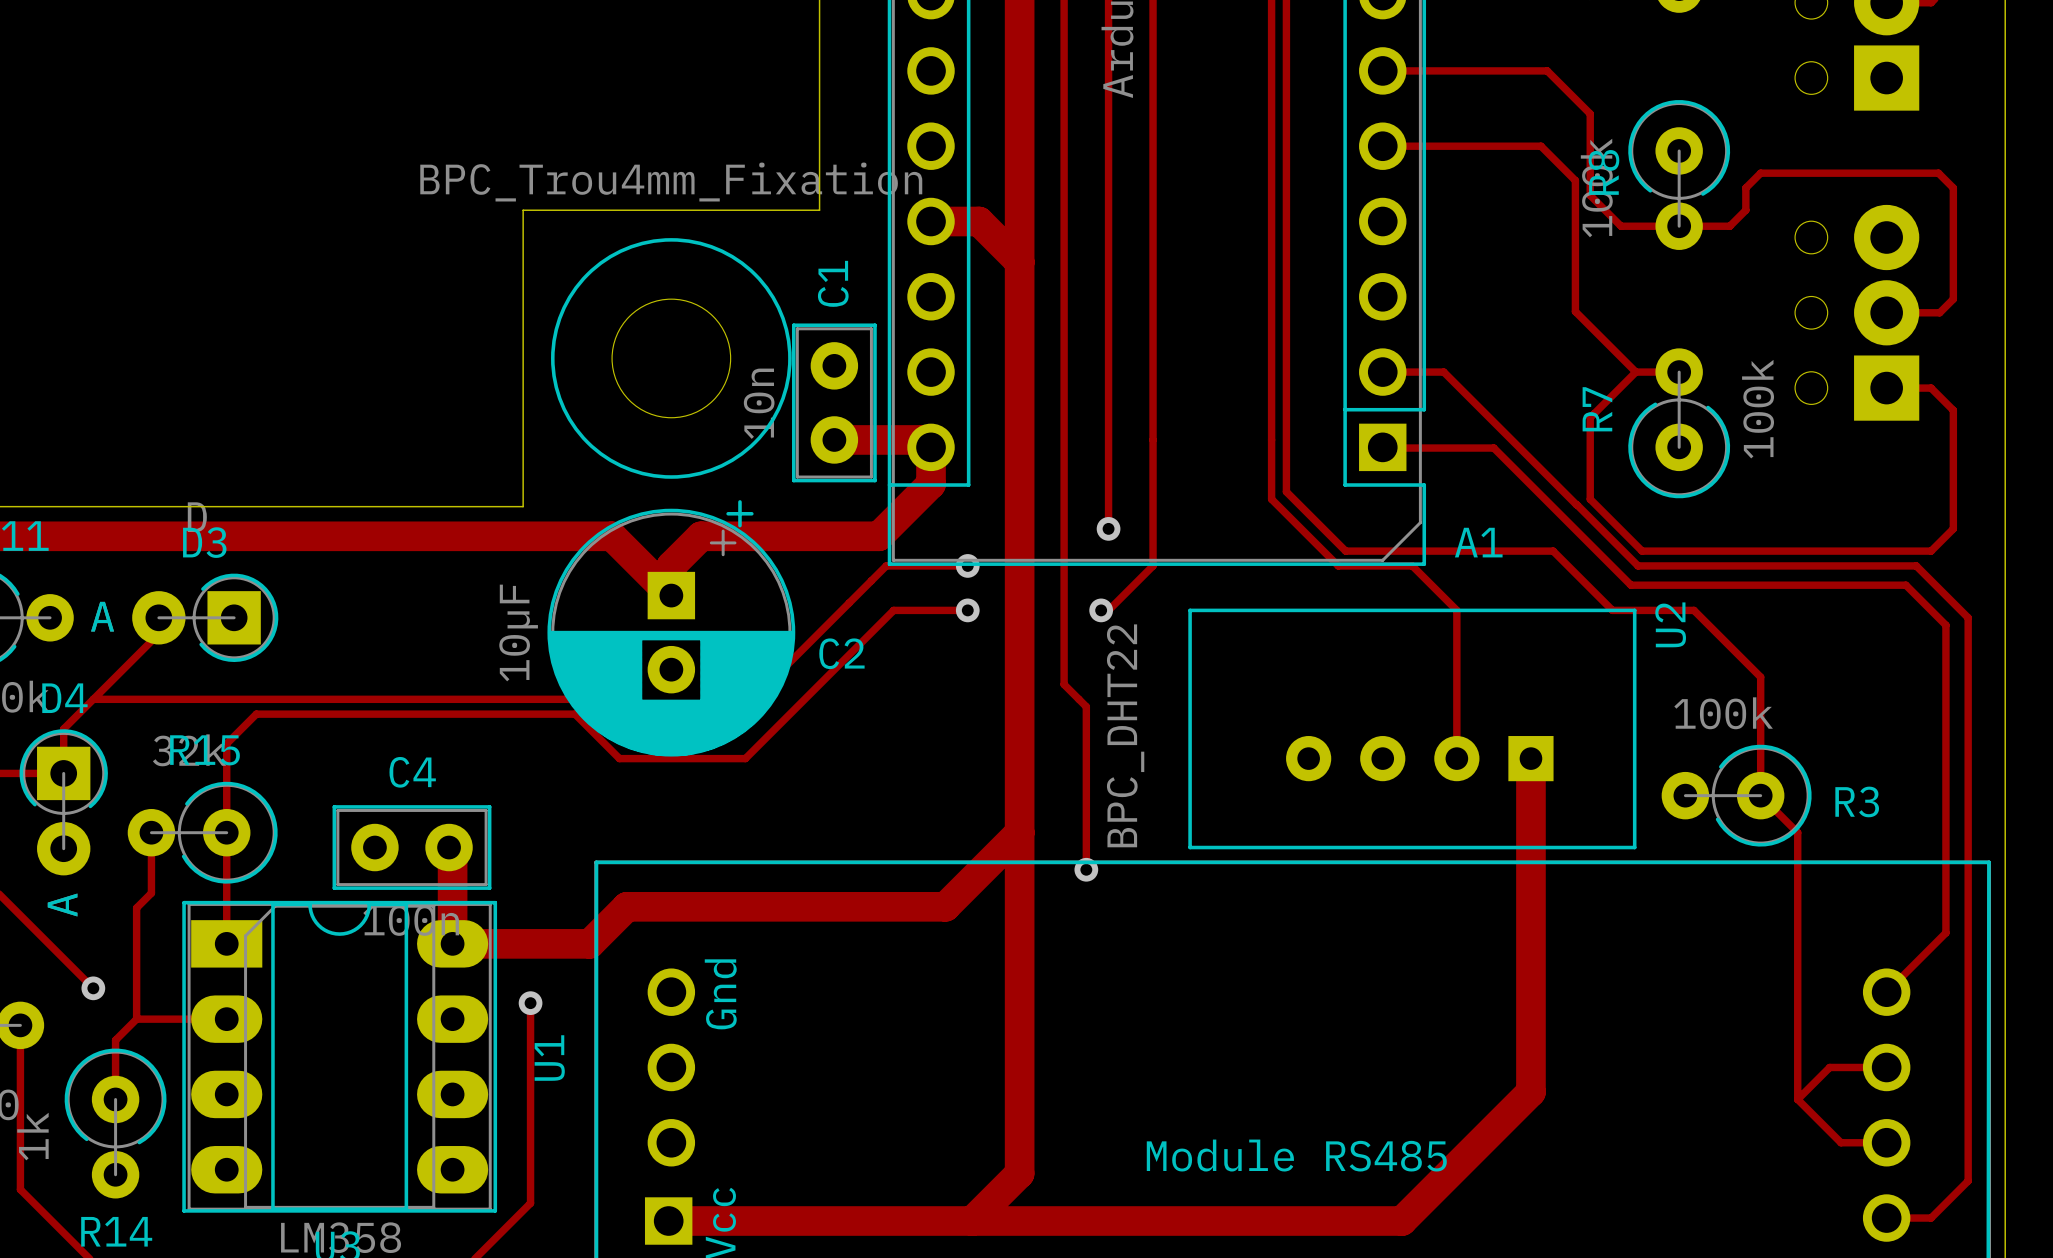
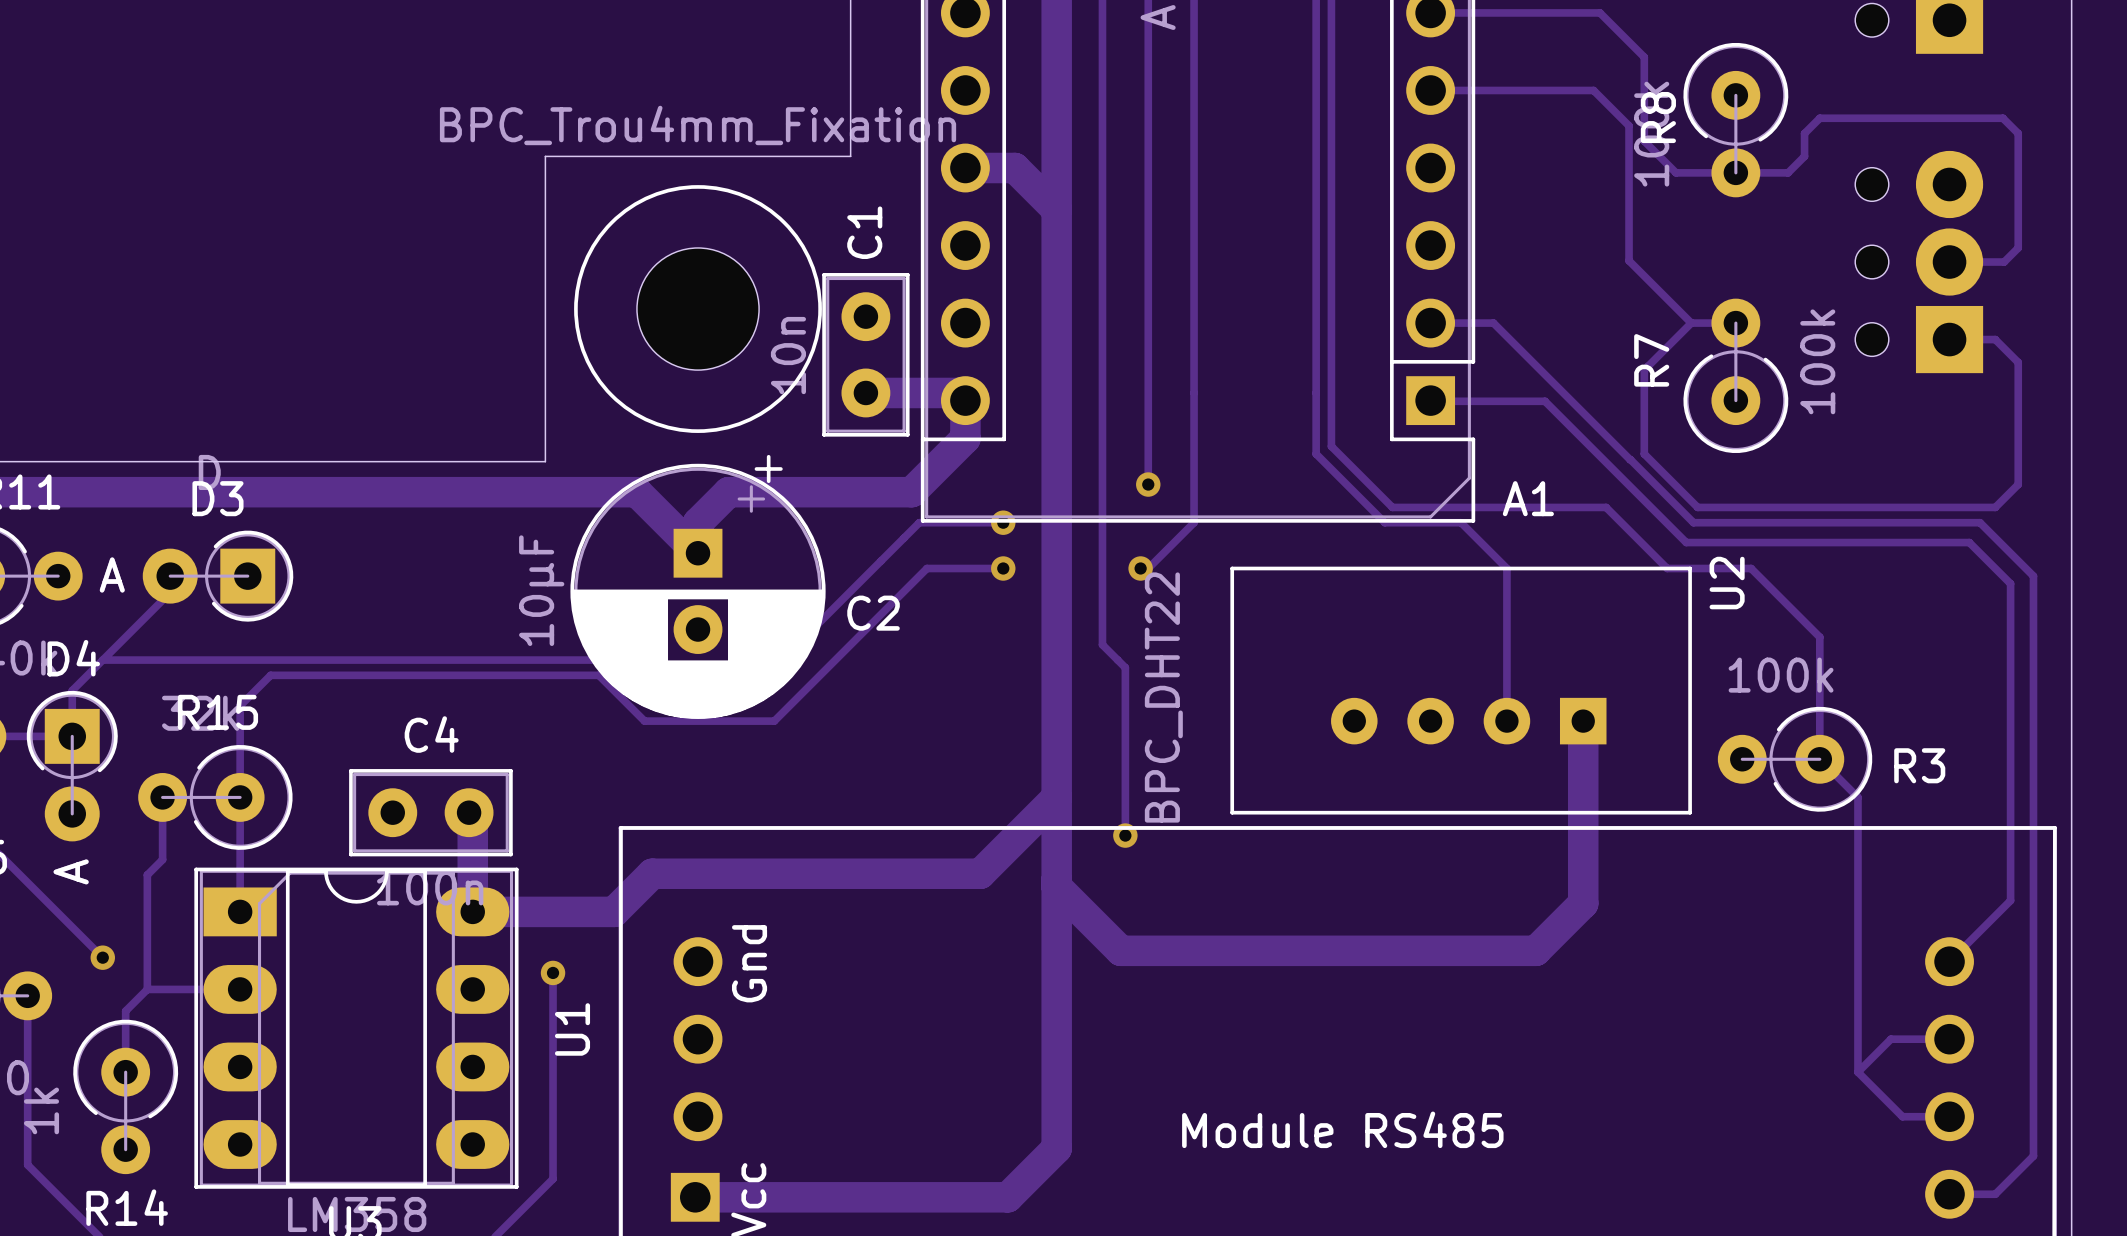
track: (1530, 935) (1530, 1092) (1402, 1221) (972, 1221) -> (1583, 903) (1535, 950) (1120, 950) (1056, 886)

